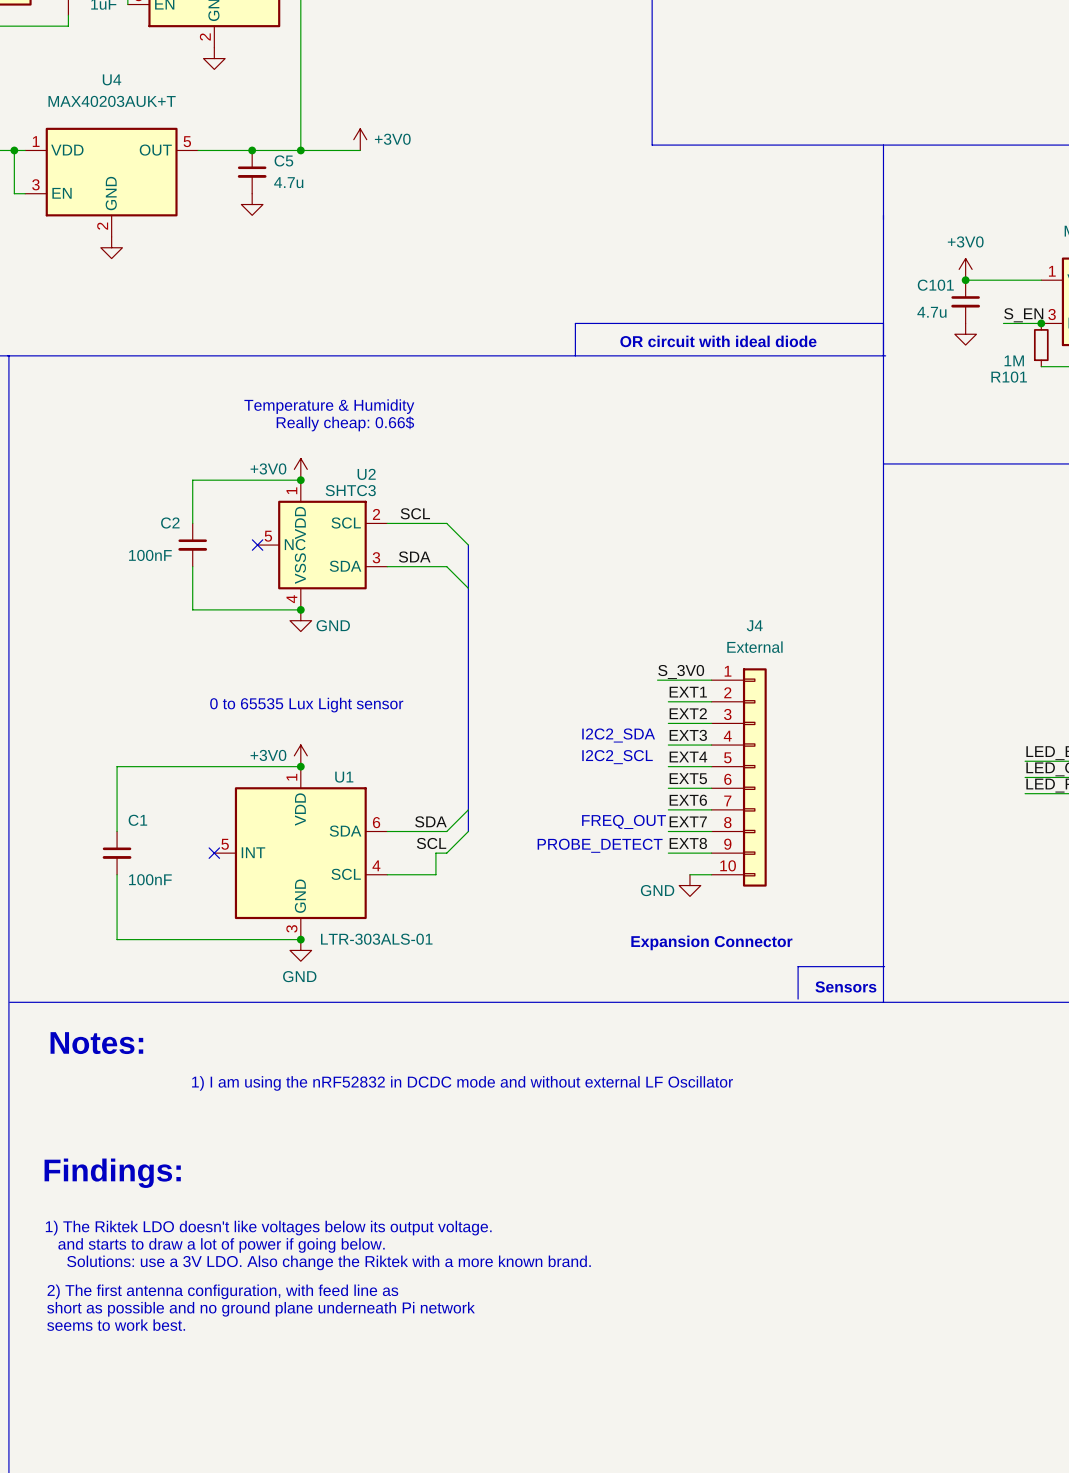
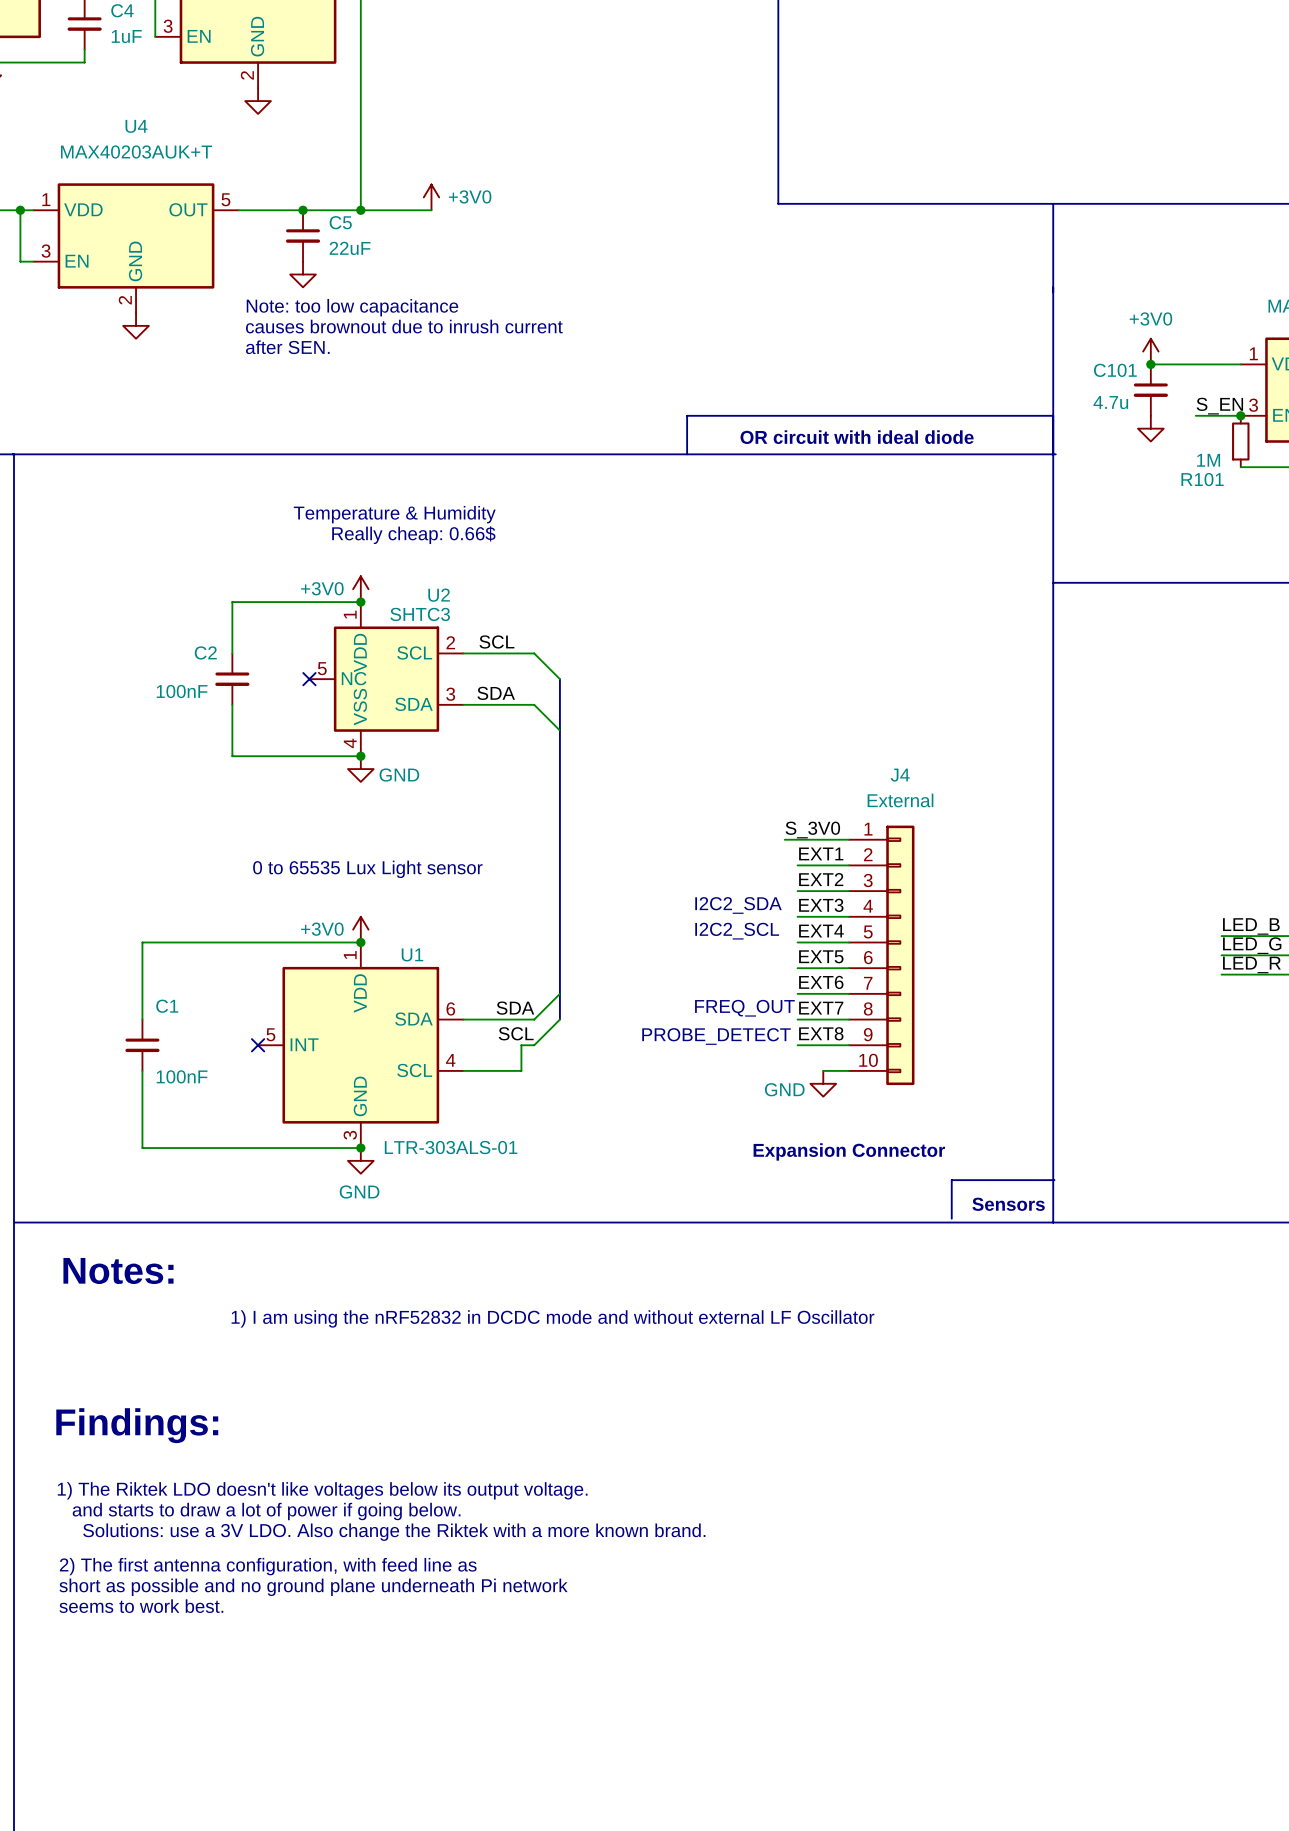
C5 value: 4.7u (288, 182) -> 22uF (350, 248)
text: none -> Note: too low capacitance (352, 307)
text: none -> causes brownout due to inrush current (404, 326)
text: none -> after SEN. (287, 347)

